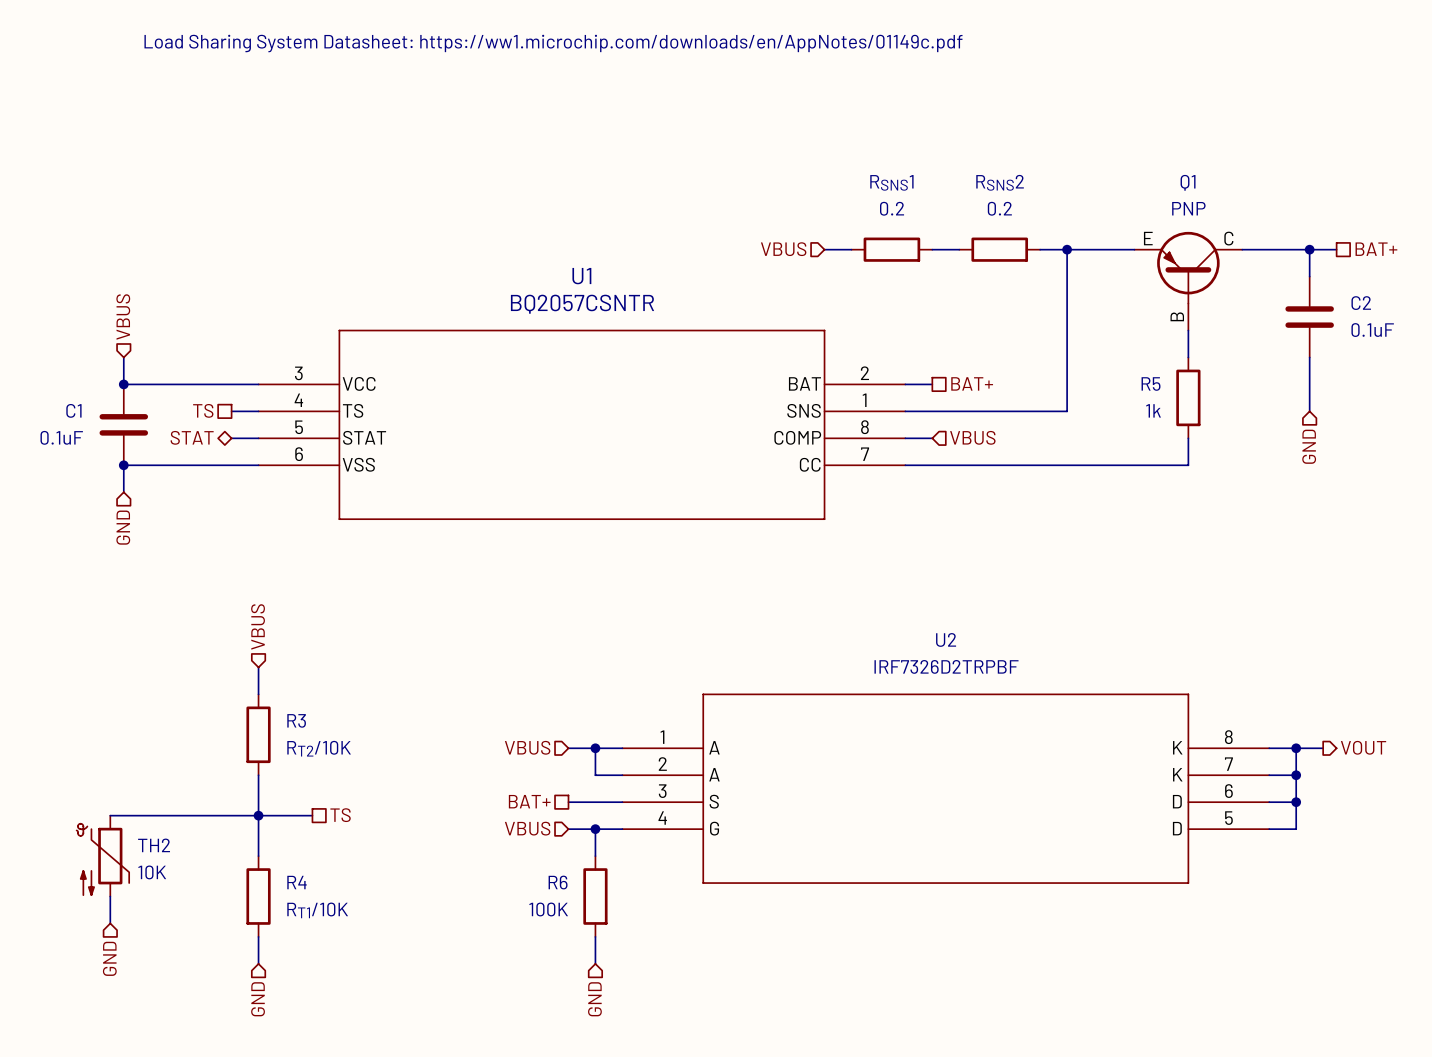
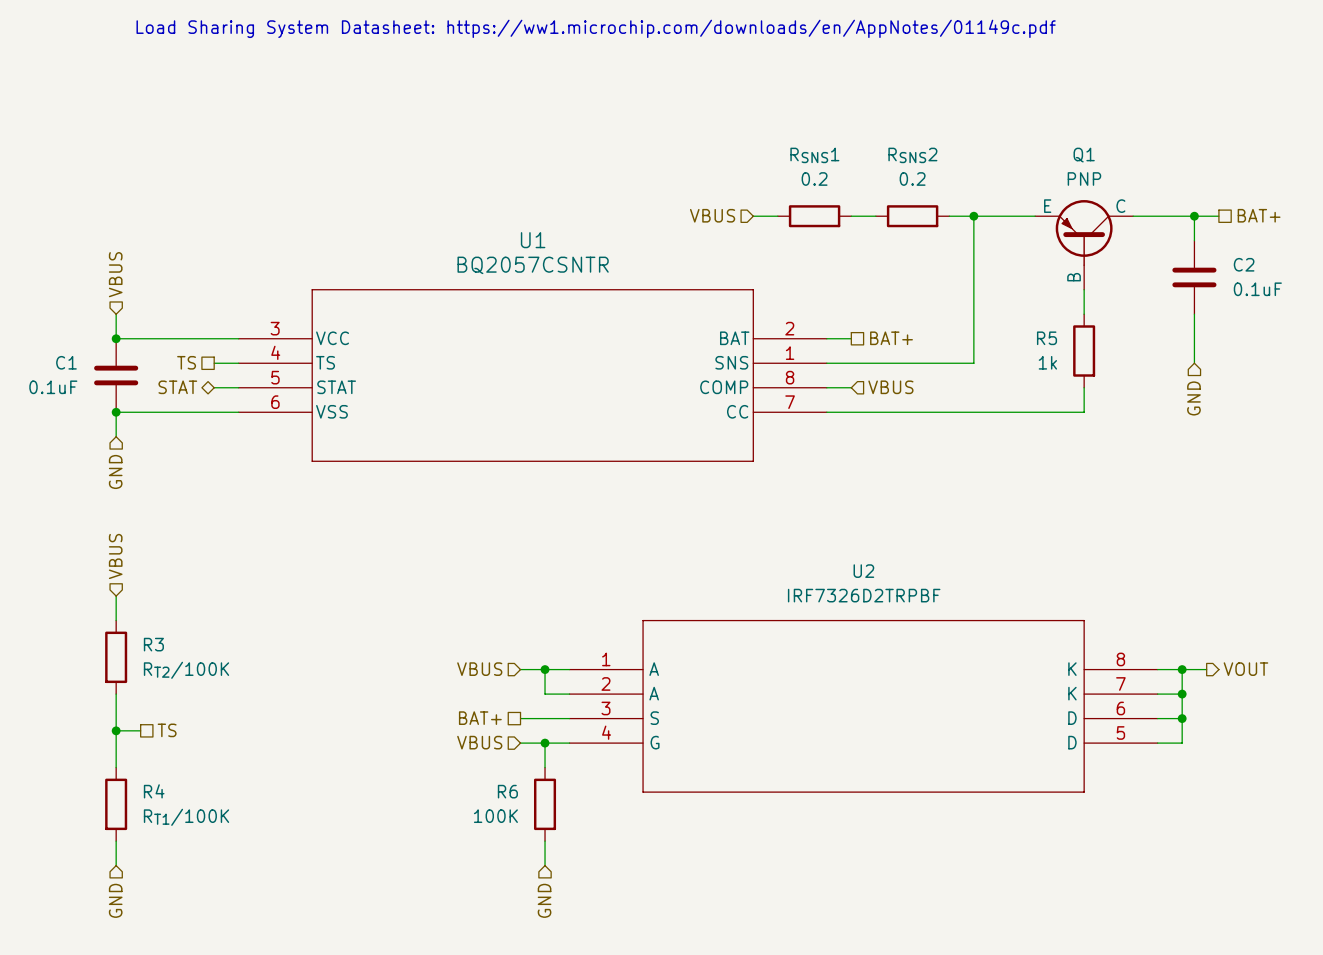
hierarchical label position: VBUS (258, 626) -> VBUS (115, 556)
wire: (258, 667) (258, 694) -> (116, 596) (116, 620)
R3 position: (258, 734) -> (116, 657)
R3 value: RT2/10K (319, 748) -> RT2/100K (186, 670)
wire: (258, 775) (258, 856) -> (116, 694) (116, 767)
wire: (110, 815) (123, 815) -> none
junction: none -> (116, 730)
wire: (150, 815) (312, 815) -> none
junction: (258, 815) -> none
hierarchical label position: TS (340, 815) -> TS (167, 730)
TH2: 10K (102, 856) -> none
wire: (110, 896) (110, 923) -> none
R4 position: (258, 896) -> (116, 804)
R4 value: RT1/10K (317, 910) -> RT1/100K (186, 817)
wire: (258, 936) (258, 963) -> (116, 841) (116, 865)
hierarchical label position: GND (109, 958) -> GND (115, 900)
hierarchical label: GND (258, 999) -> none

